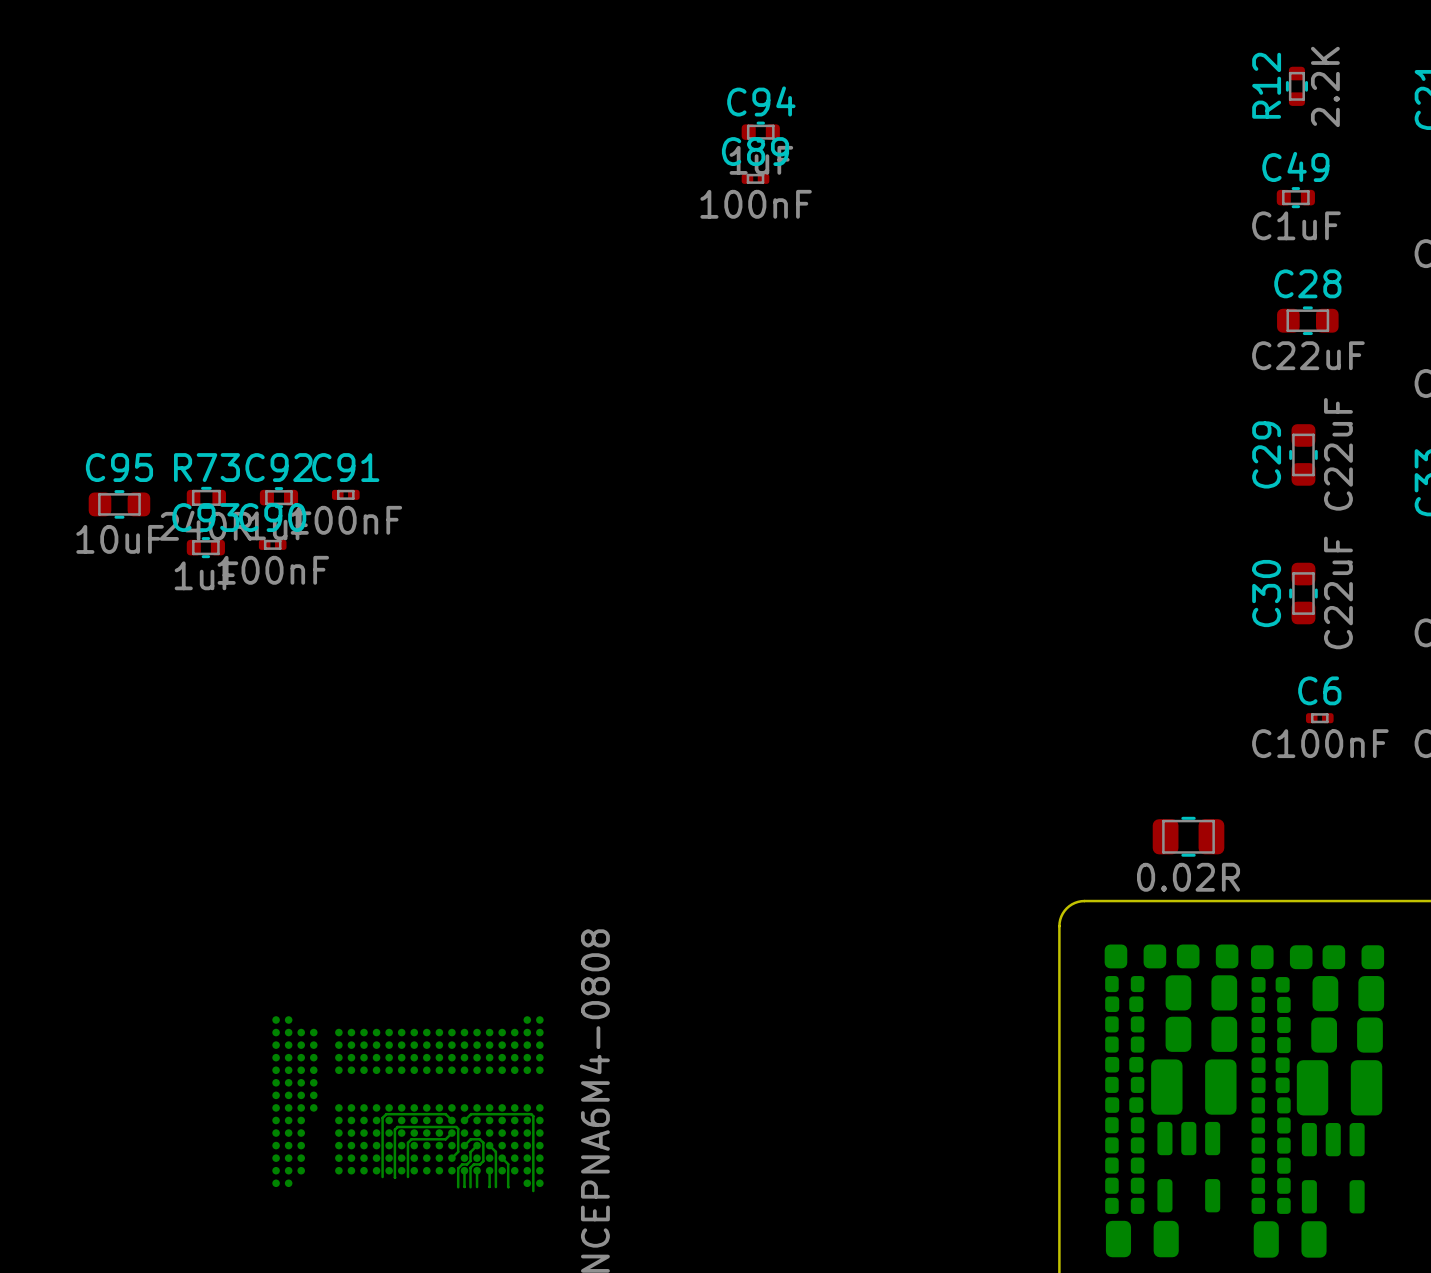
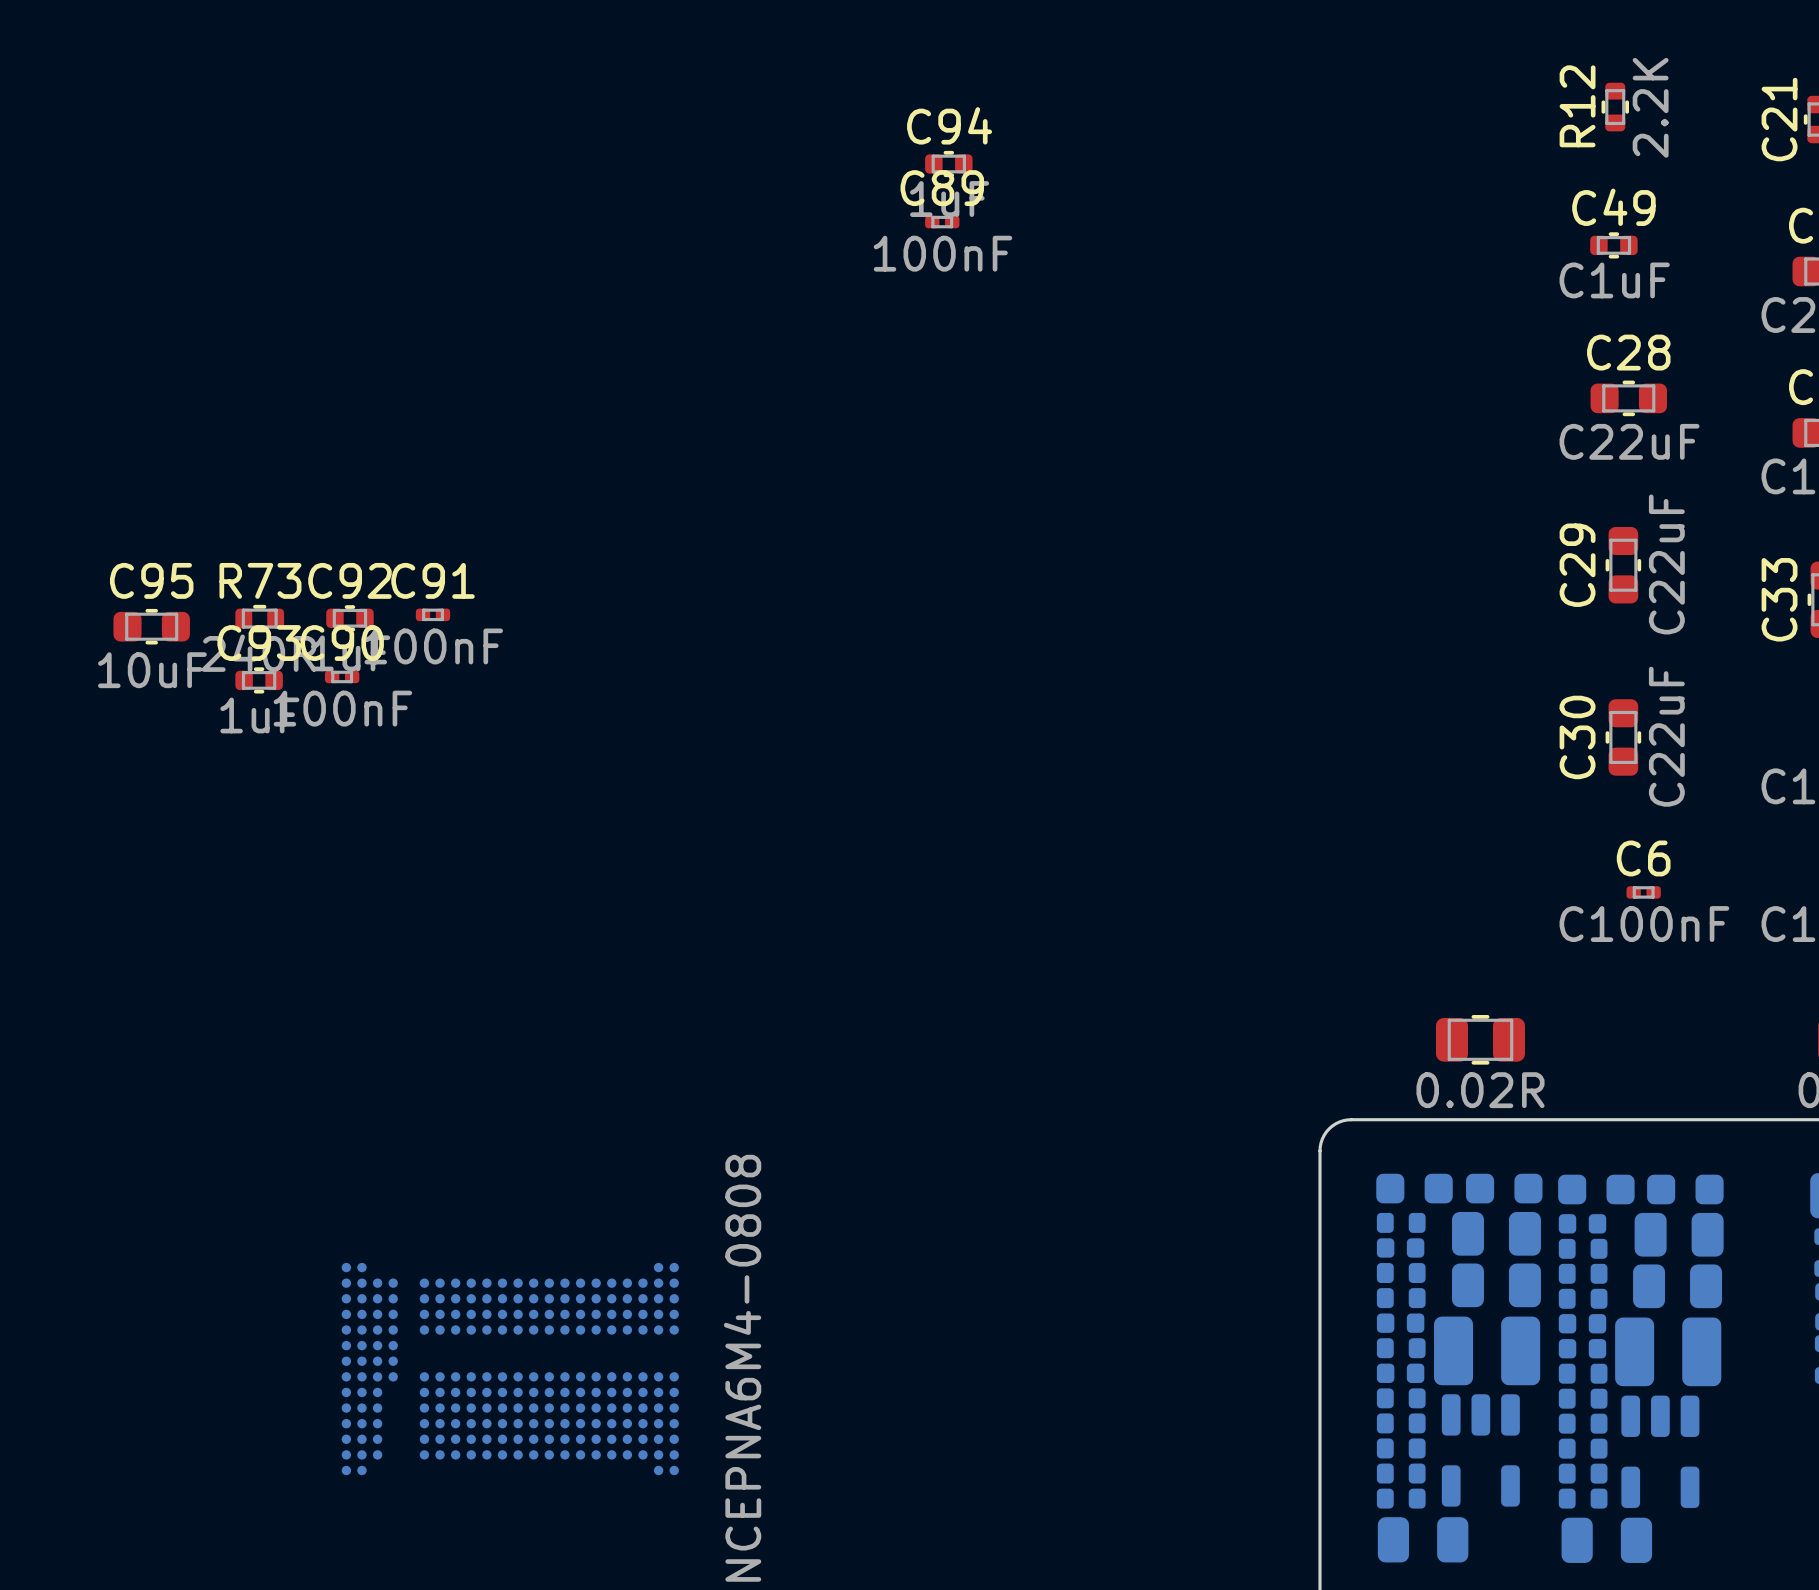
bottom track: (451, 1120) (445, 1114) (386, 1114) (382, 1117) (382, 1176) -> none
bottom track: (464, 1120) (471, 1114) (531, 1114) (533, 1116) (533, 1191) -> none
bottom track: (451, 1133) (445, 1139) (411, 1139) (407, 1142) (407, 1176) -> none
bottom track: (464, 1145) (470, 1139) (479, 1139) (483, 1142) (483, 1161) (470, 1167) (470, 1187) -> none
bottom track: (477, 1145) (470, 1152) (470, 1160) (458, 1168) (458, 1187) -> none
bottom track: (489, 1145) (495, 1151) (495, 1187) -> none
bottom track: (451, 1158) (458, 1151) (458, 1129) (456, 1127) (397, 1127) (394, 1129) (394, 1177) -> none
bottom track: (502, 1158) (508, 1164) (508, 1187) -> none
bottom track: (464, 1170) (464, 1186) -> none
bottom track: (477, 1170) (477, 1187) -> none
bottom track: (489, 1170) (489, 1186) -> none

